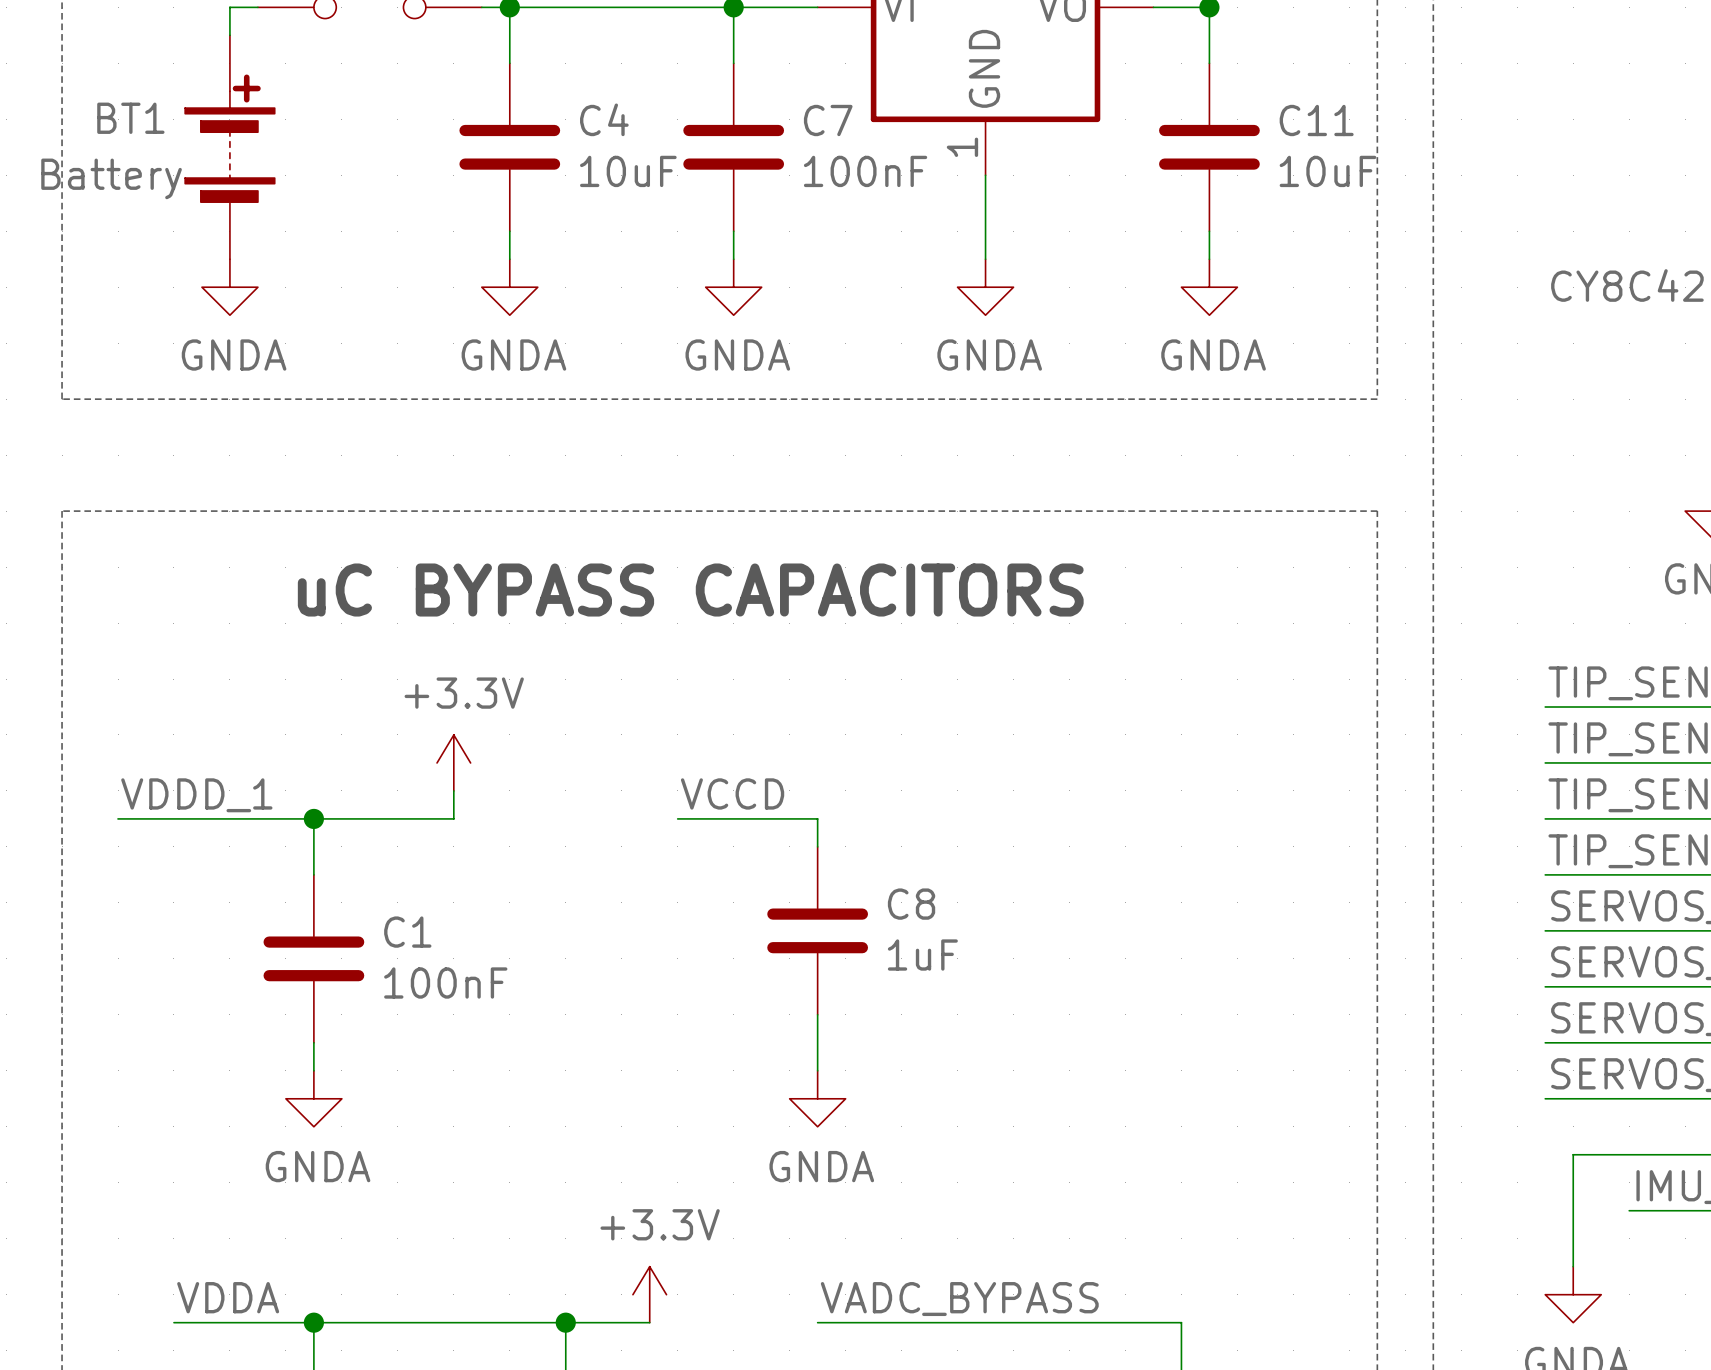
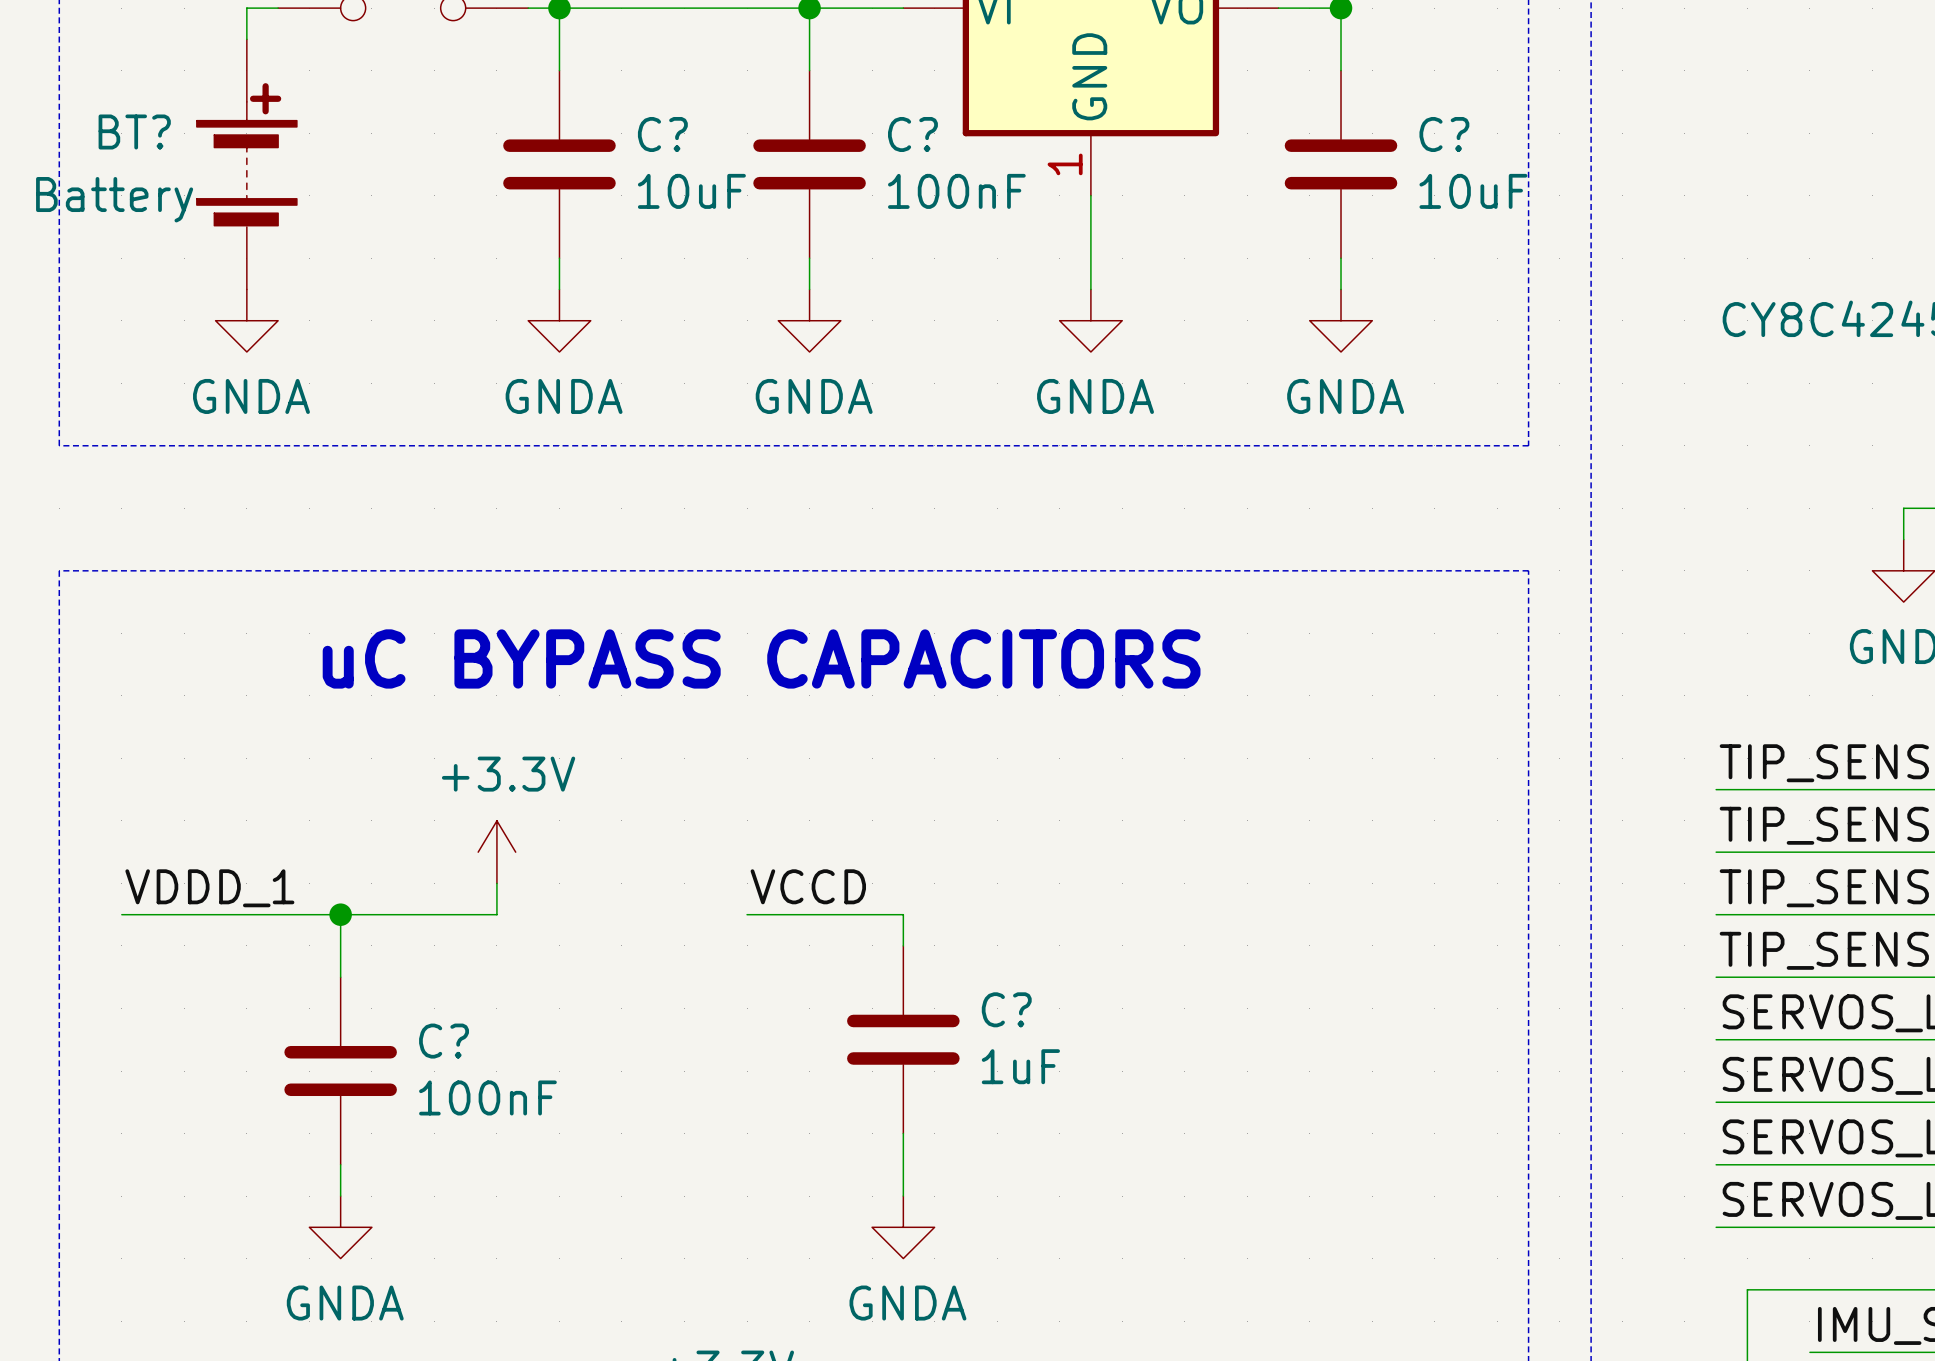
BT1 name: BT1 (130, 118) -> BT? (134, 131)
C4 name: C4 (604, 119) -> C? (662, 134)
C7 name: C7 (828, 120) -> C? (912, 134)
C11 name: C11 (1316, 120) -> C? (1444, 134)
C8 name: C8 (911, 904) -> C? (1006, 1009)
C1 name: C1 (407, 932) -> C? (444, 1041)

